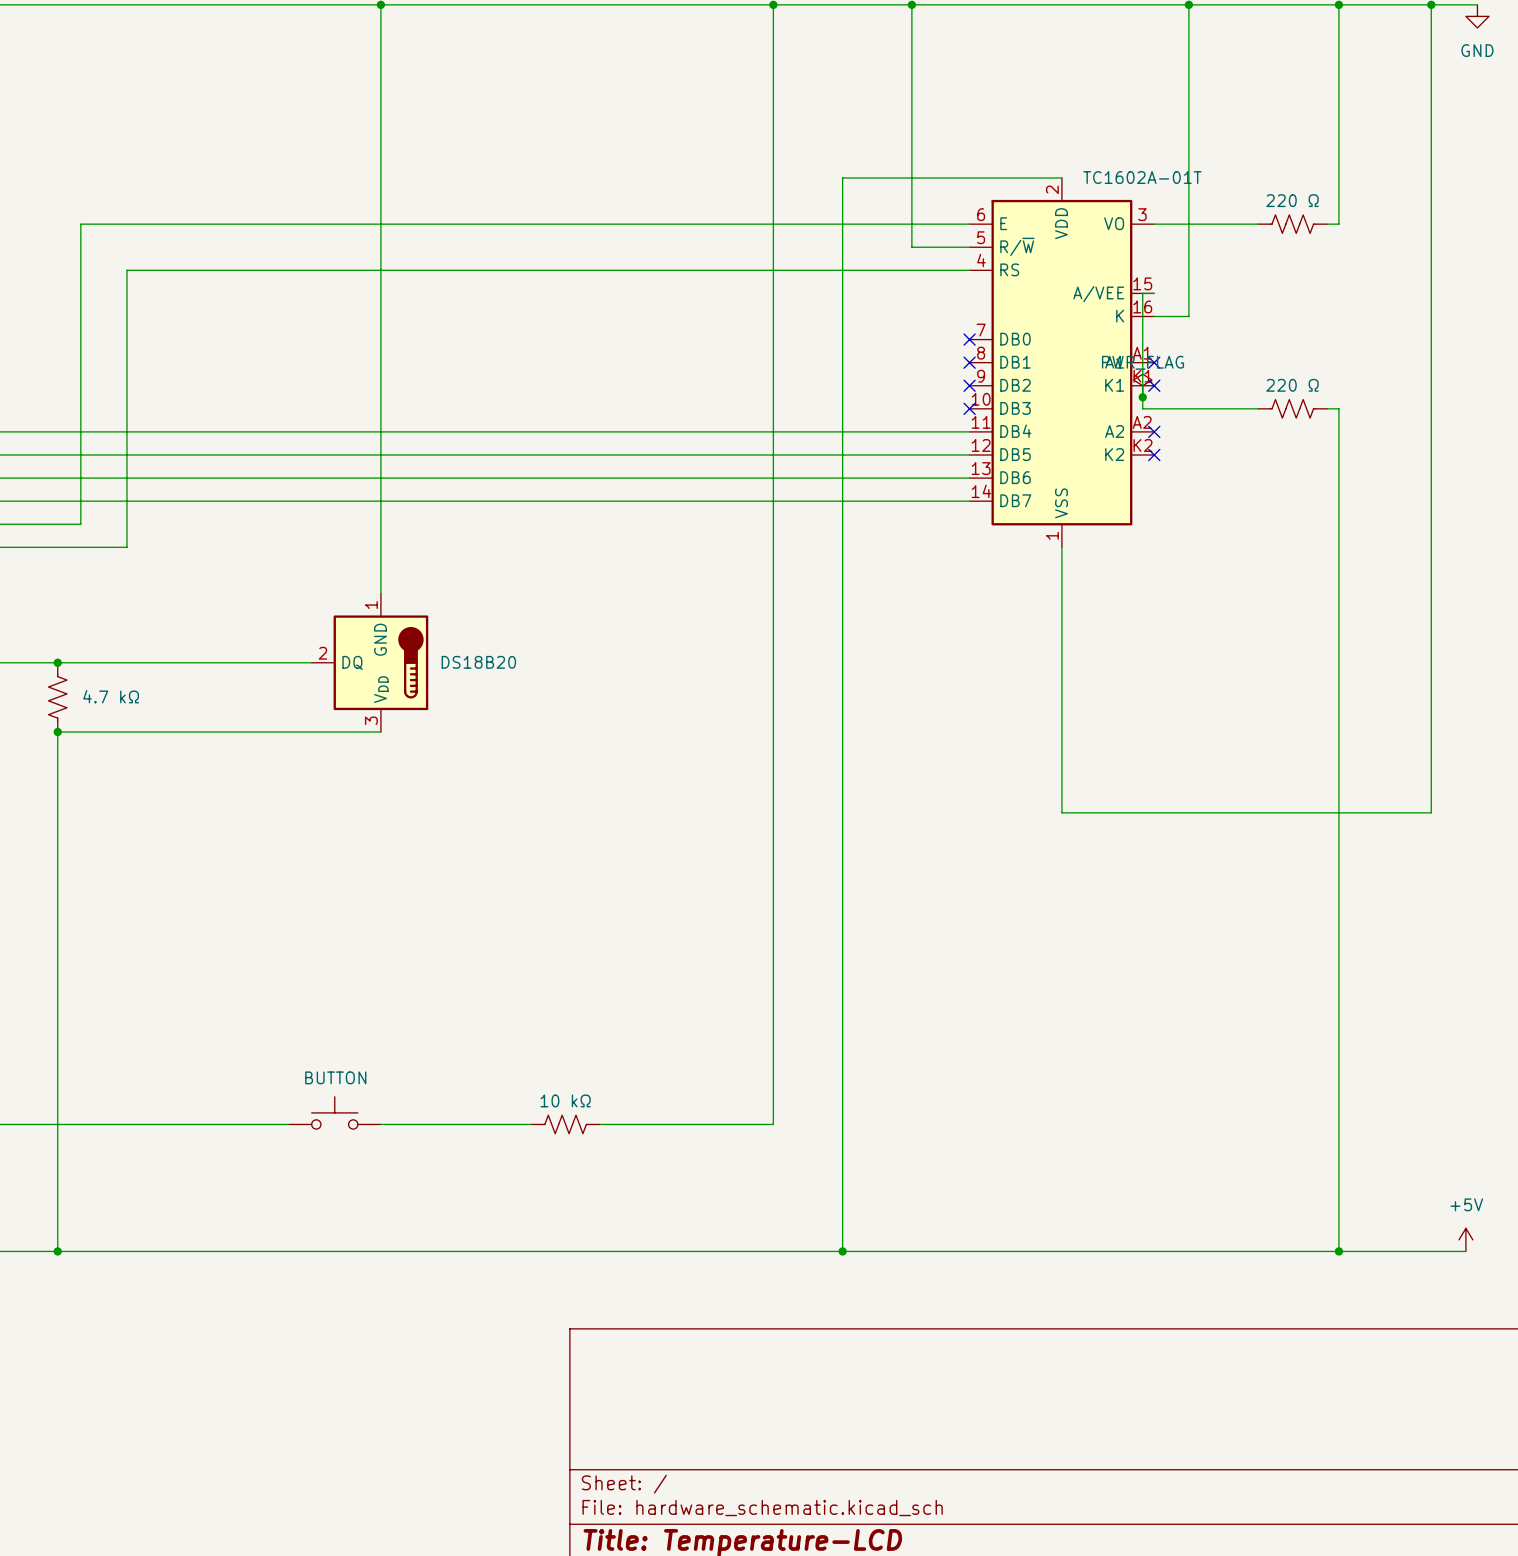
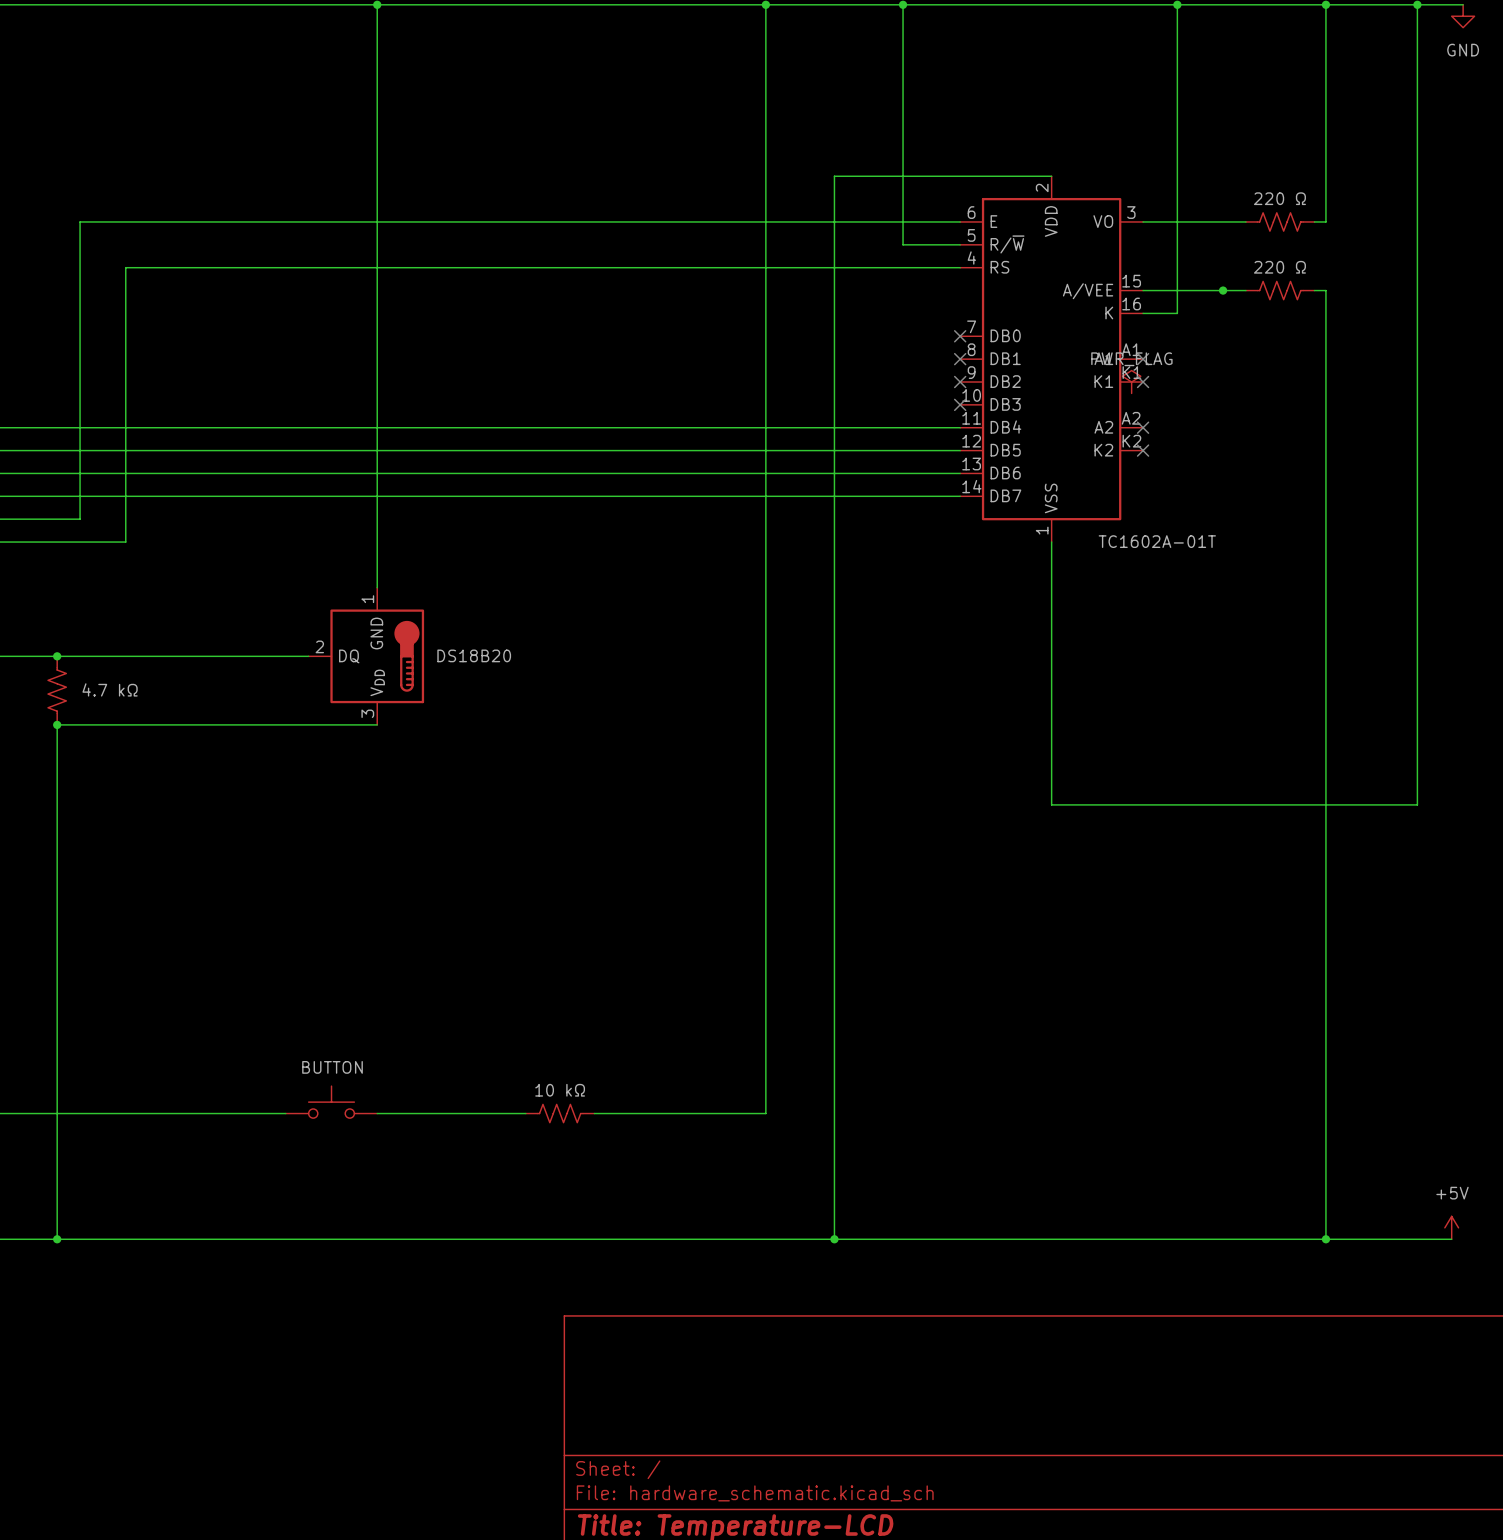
part value position: TC1602A-01T (1142, 177) -> TC1602A-01T (1157, 541)
wire: (1154, 293) (1142, 293) (1142, 408) (1258, 408) -> (1143, 290) (1245, 290)
junction: none -> (1223, 290)
junction: (1142, 397) -> none
part position: (1292, 408) -> (1280, 290)
wire: (1327, 408) (1338, 408) -> (1314, 290) (1325, 290) (1325, 404)

